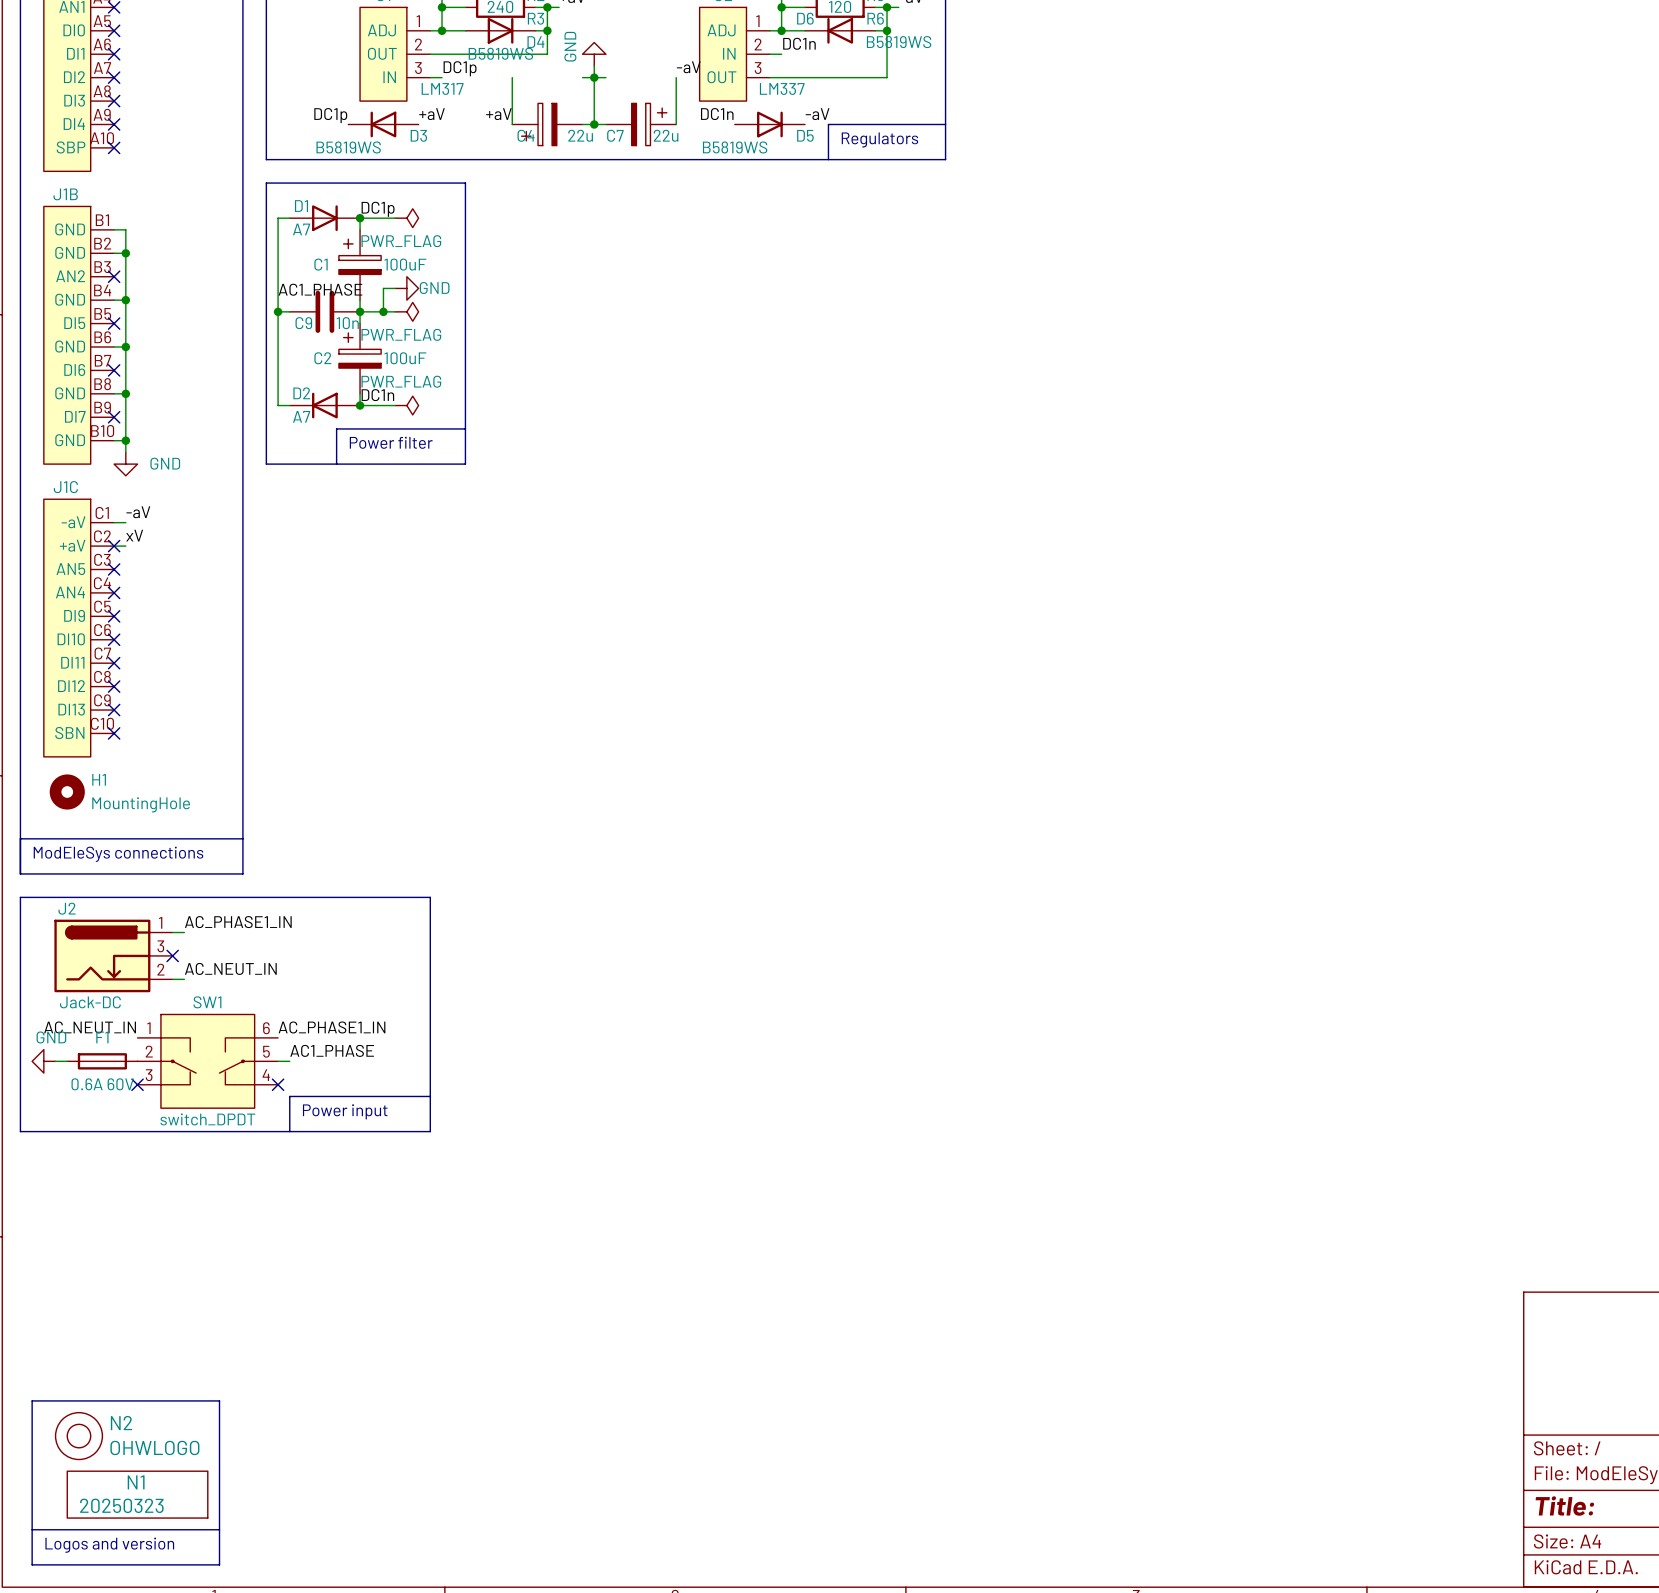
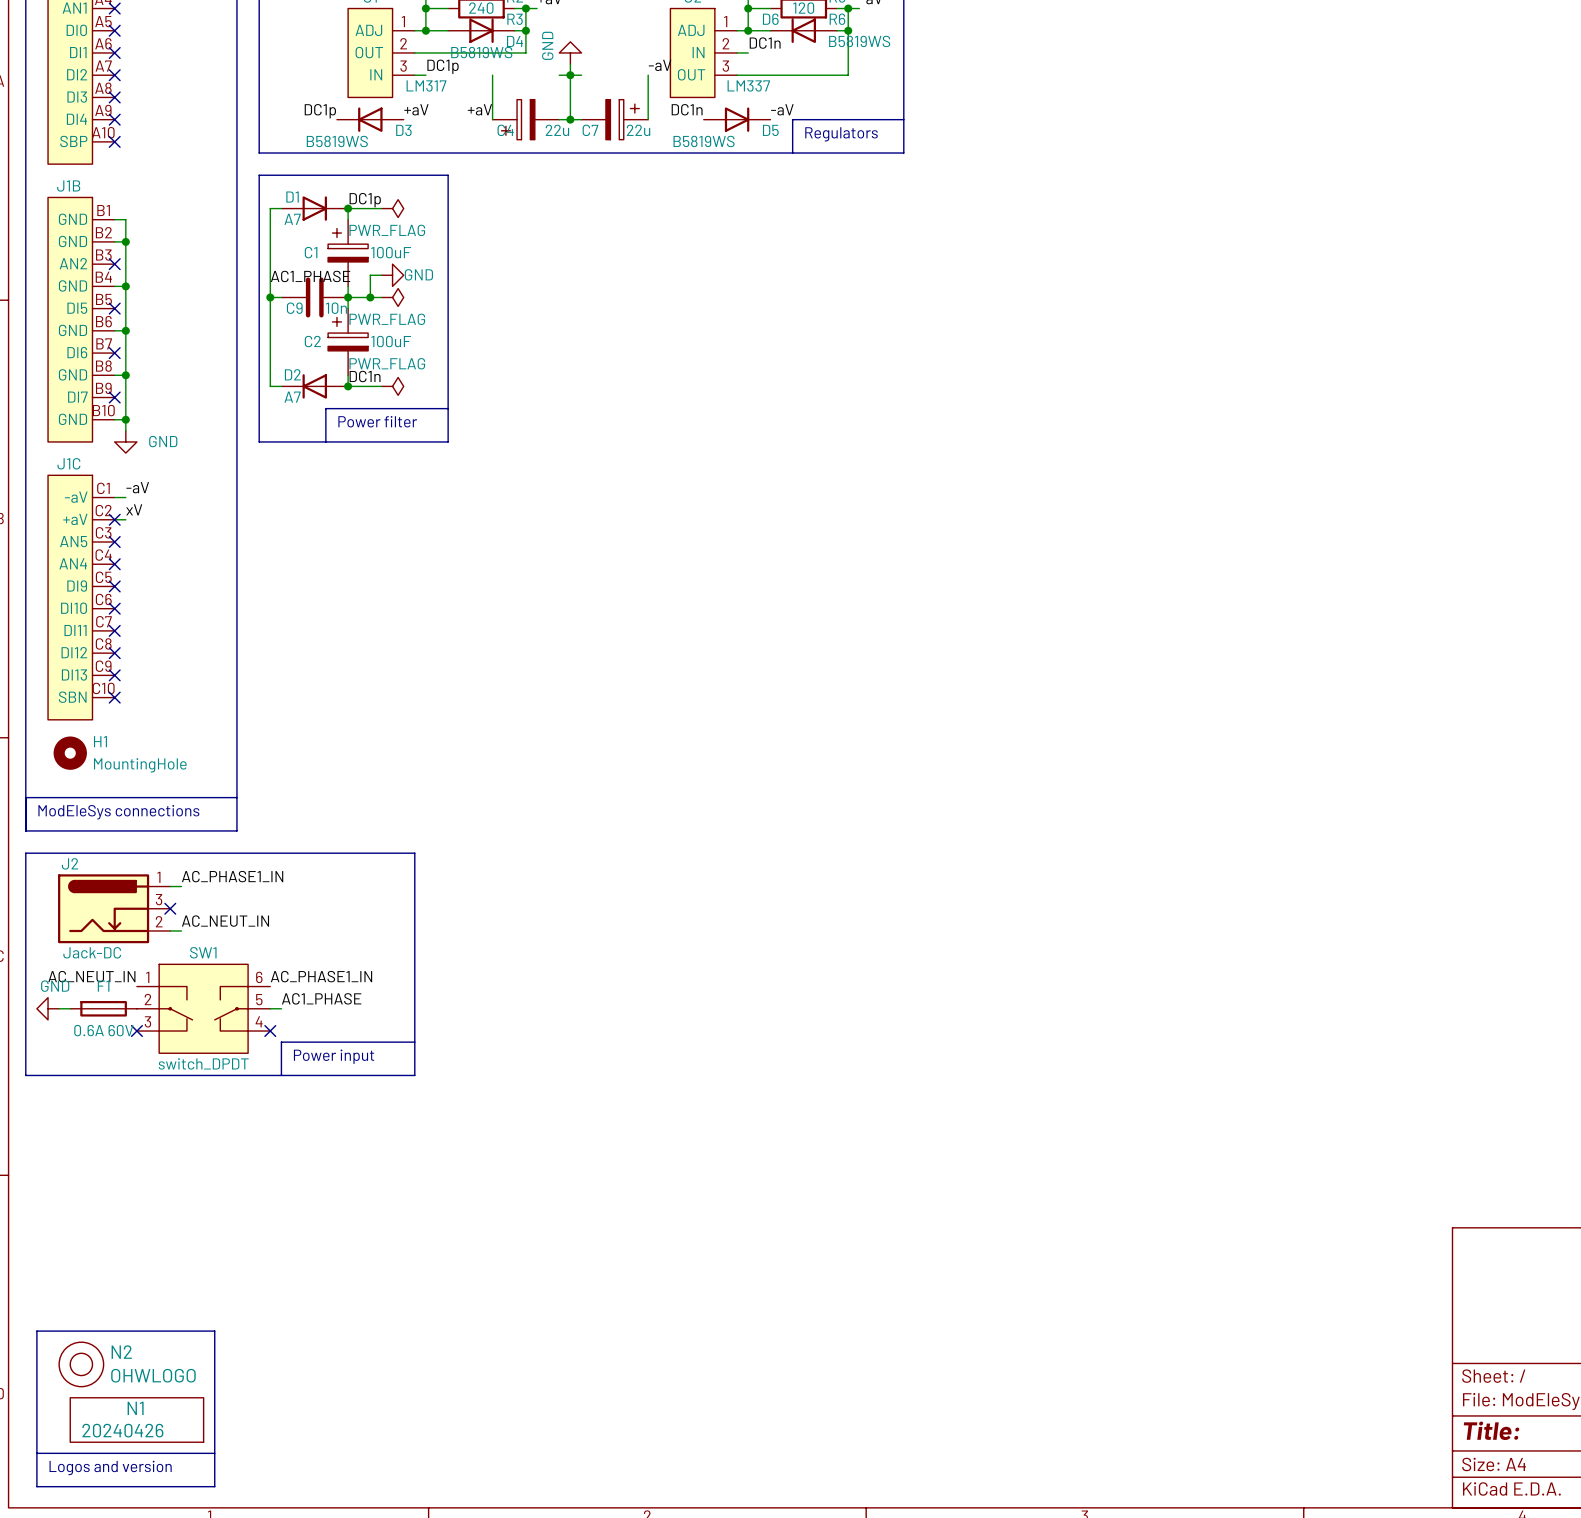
N1 value: 20250323 (121, 1505) -> 20240426 (122, 1430)

